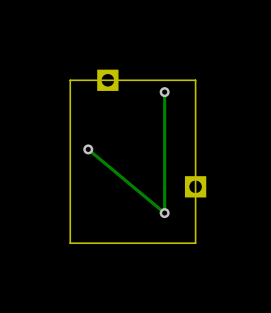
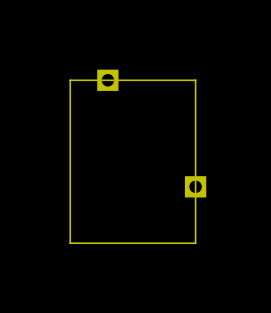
track: (164, 92) (164, 213) (88, 149) -> none
via: (164, 92) -> none
via: (88, 149) -> none
via: (164, 213) -> none

